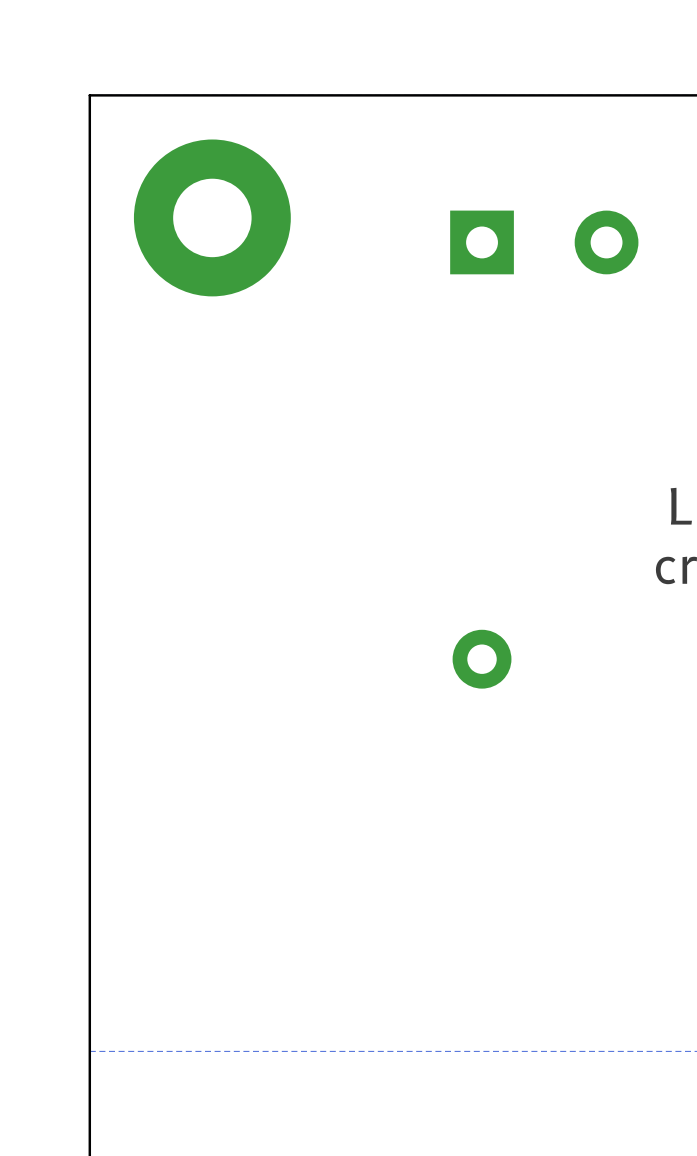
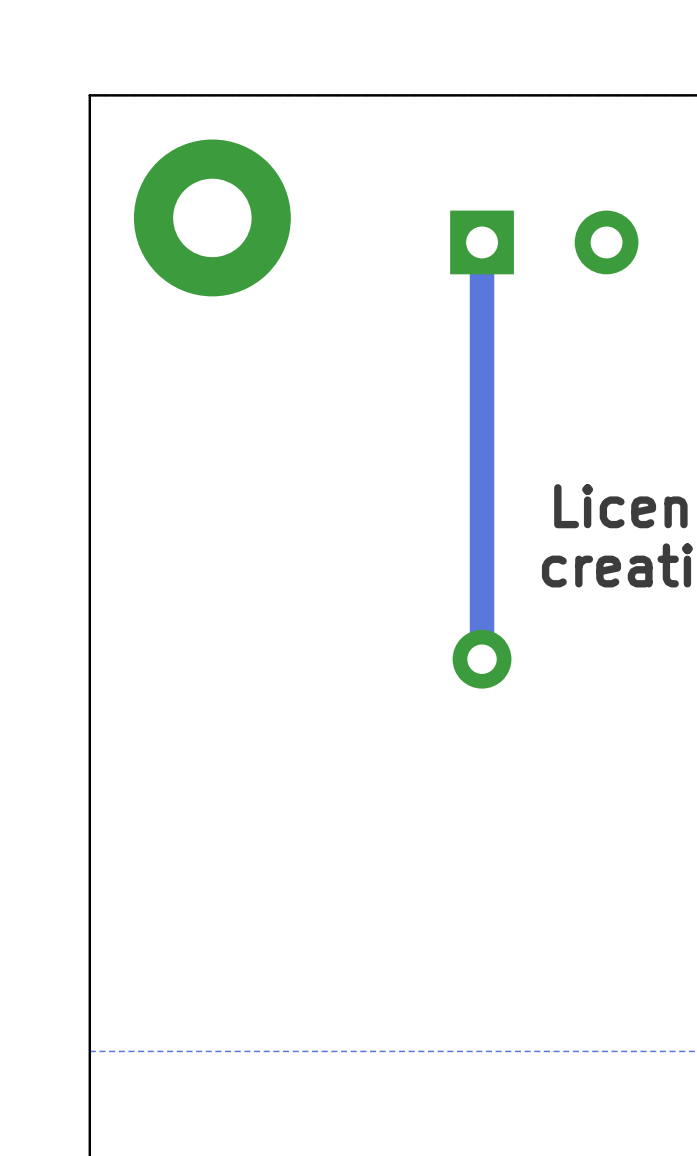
track: none -> (482, 242) (482, 659)

